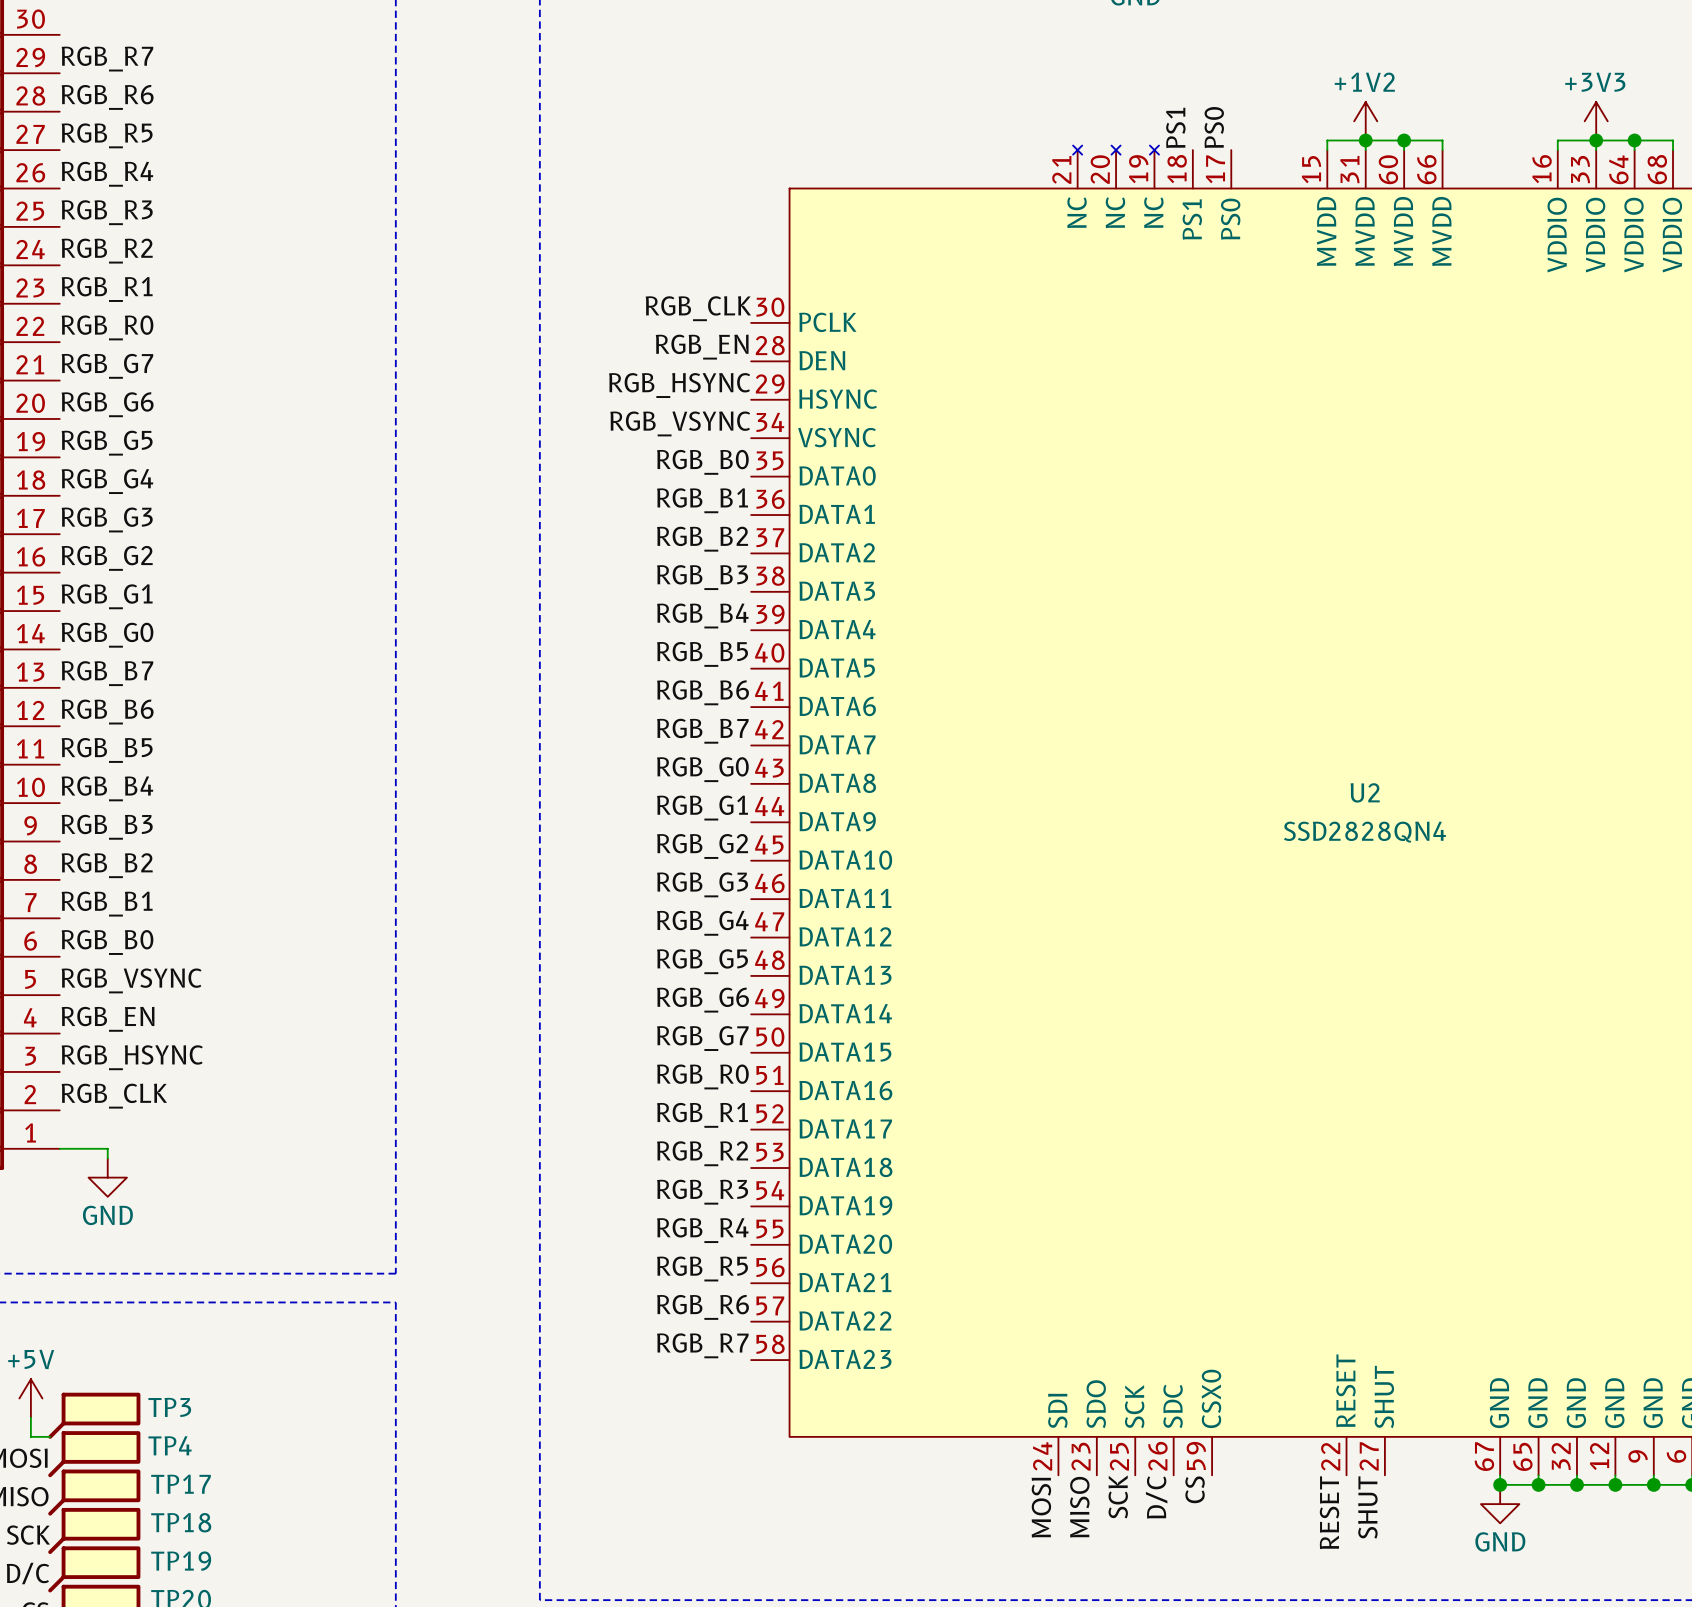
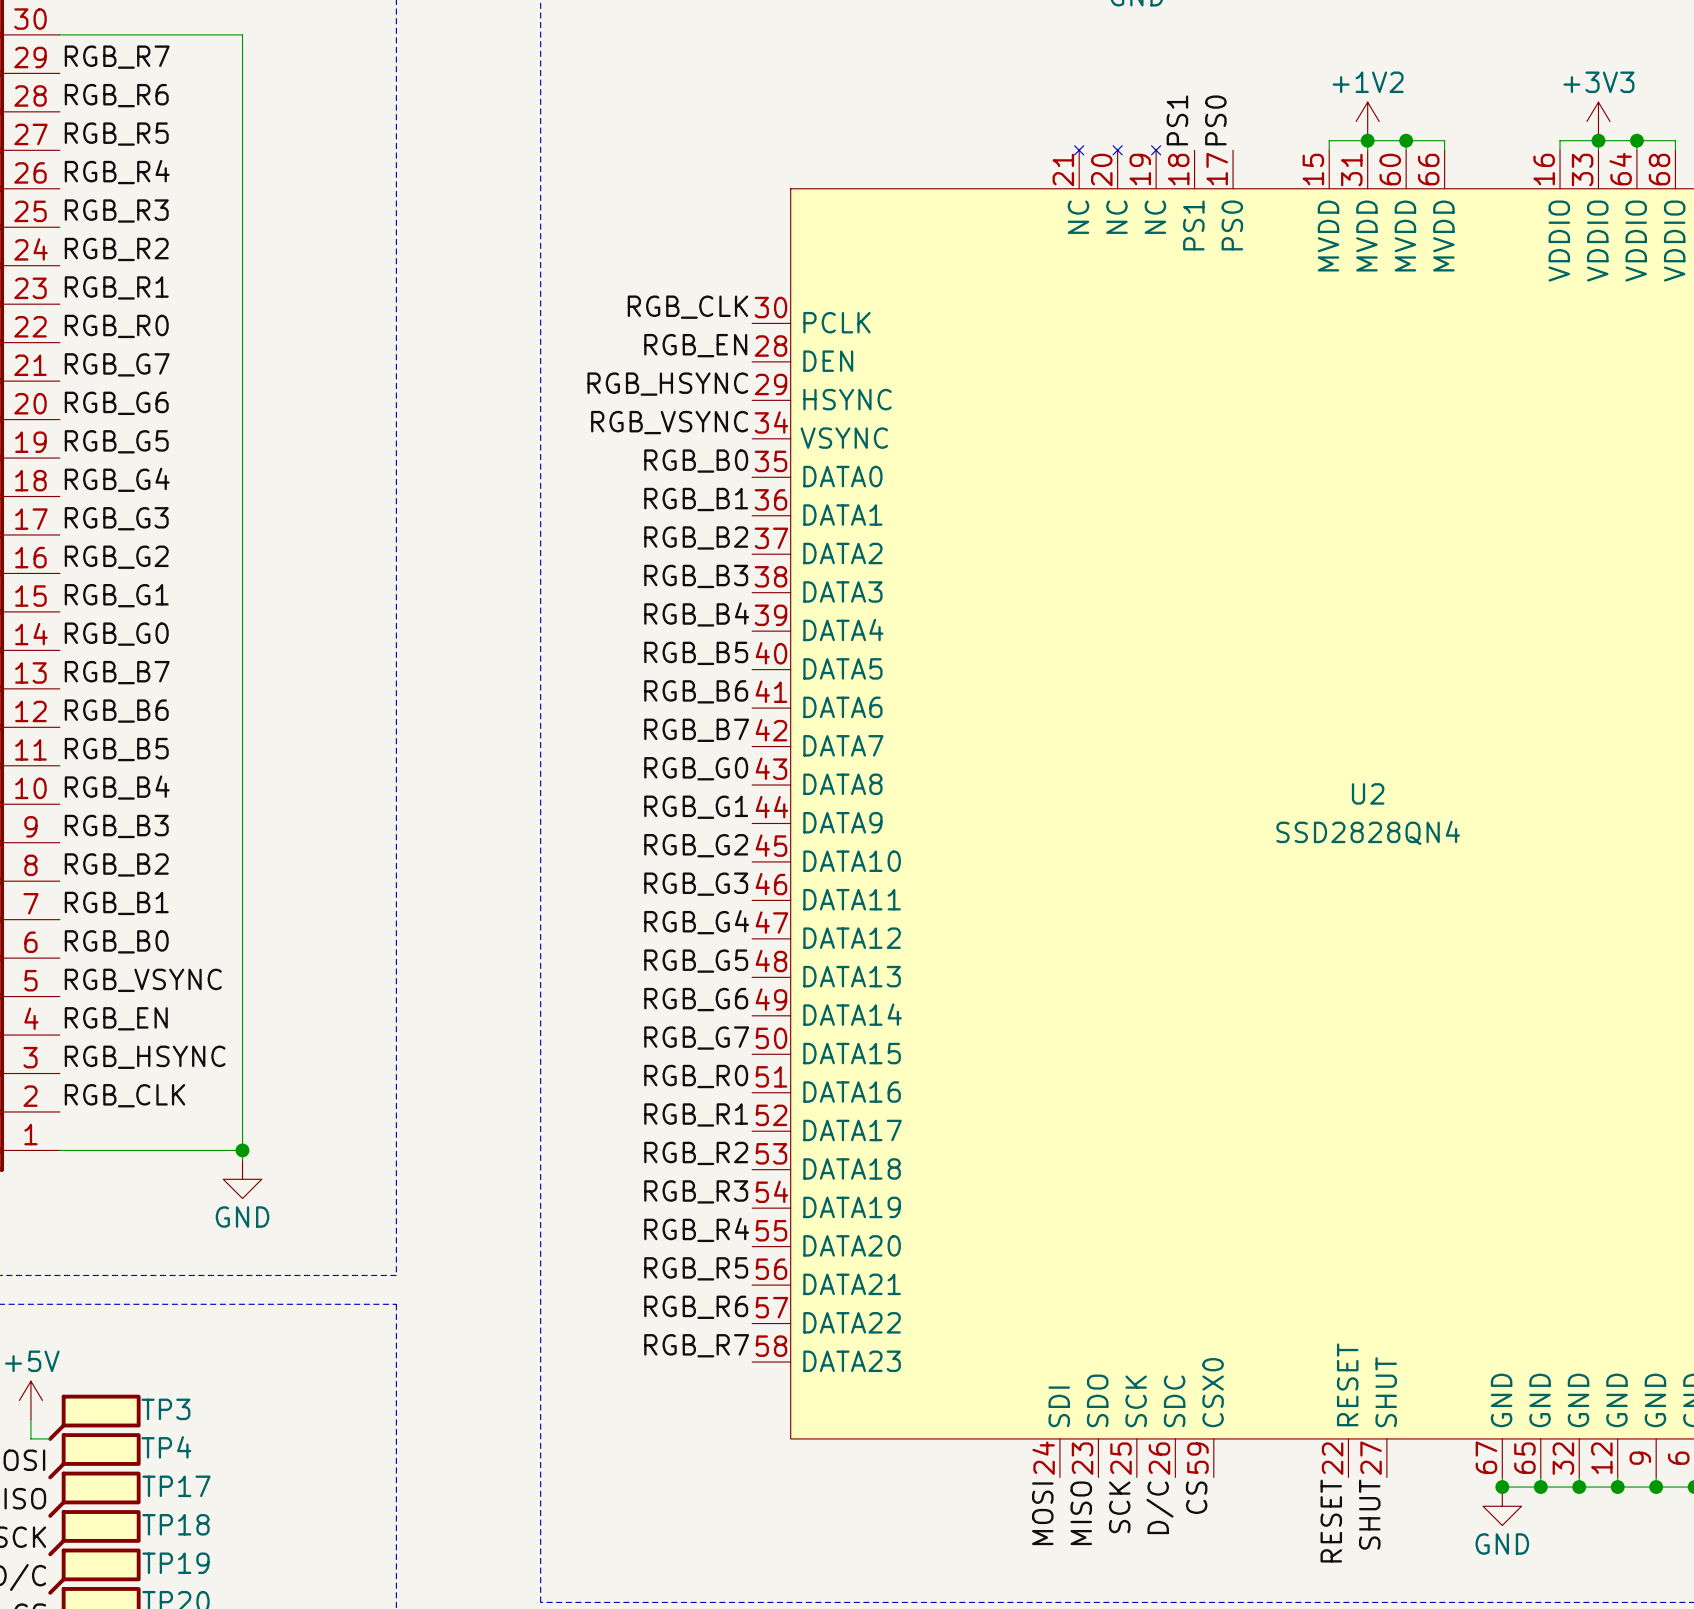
wire: none -> (59, 34) (242, 34) (242, 1160)
wire: (107, 1148) (107, 1158) -> (107, 1150) (242, 1150)
junction: none -> (242, 1150)
power symbol position: GND (107, 1177) -> GND (242, 1179)

